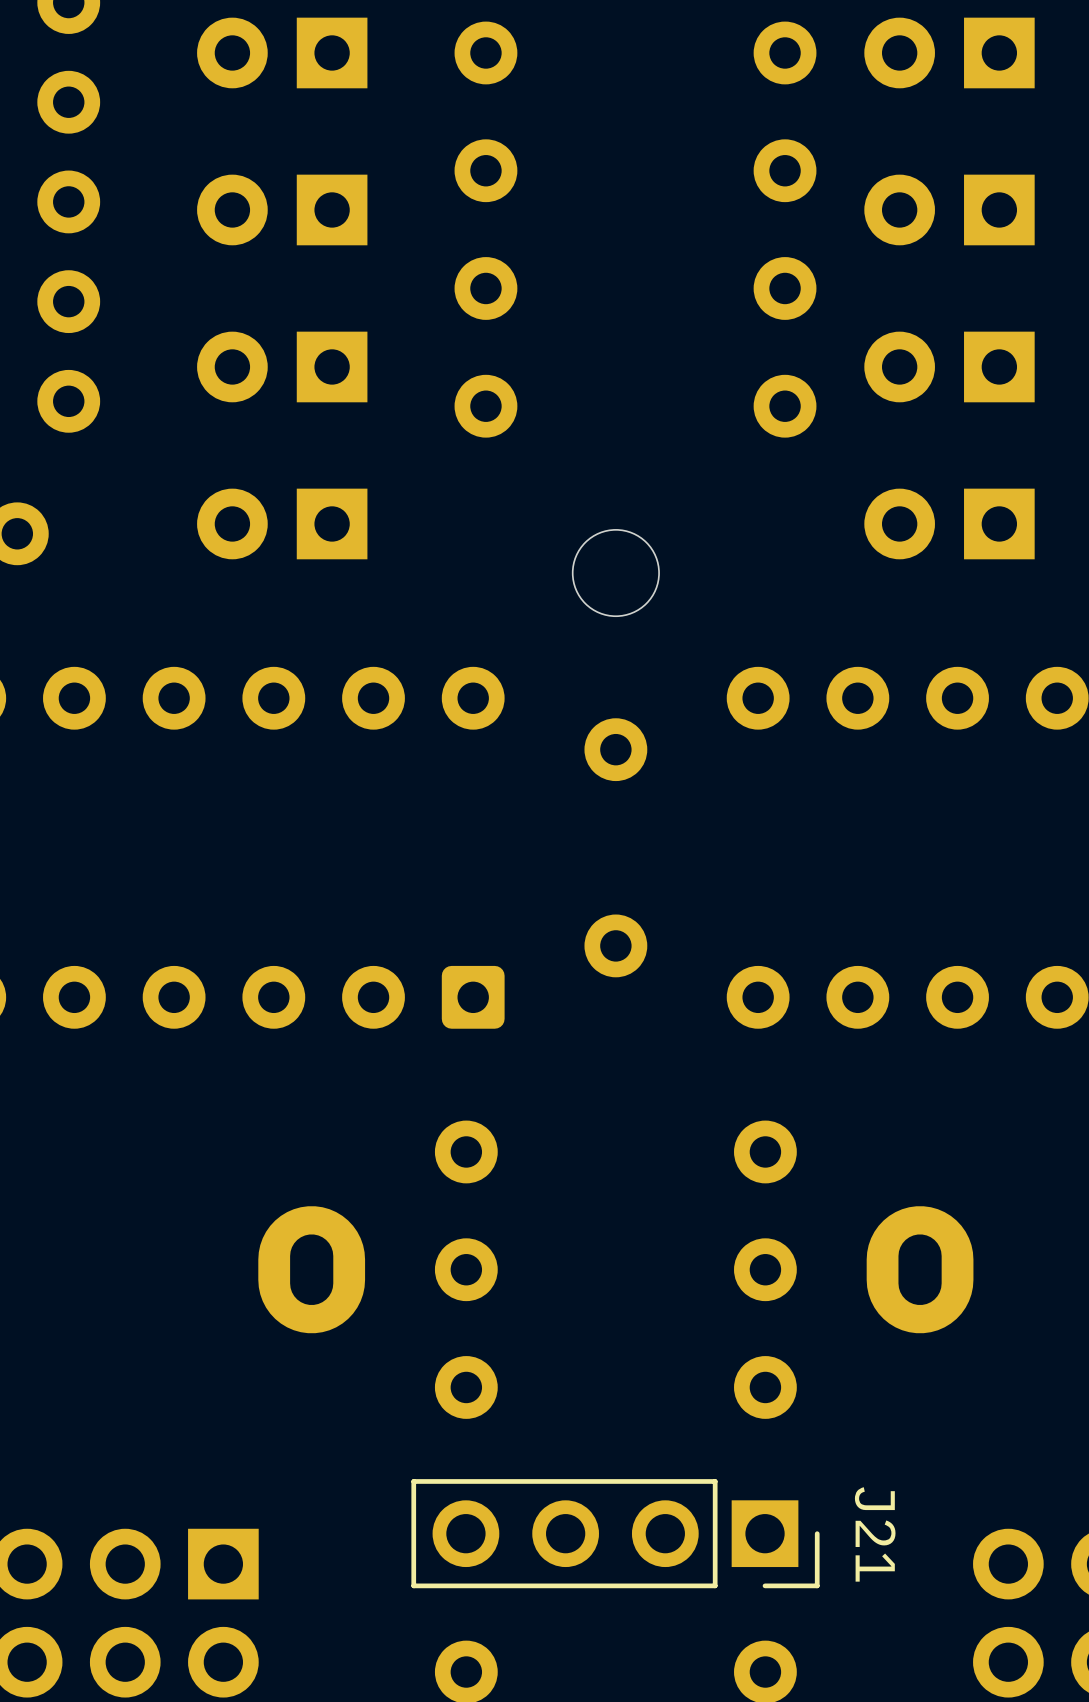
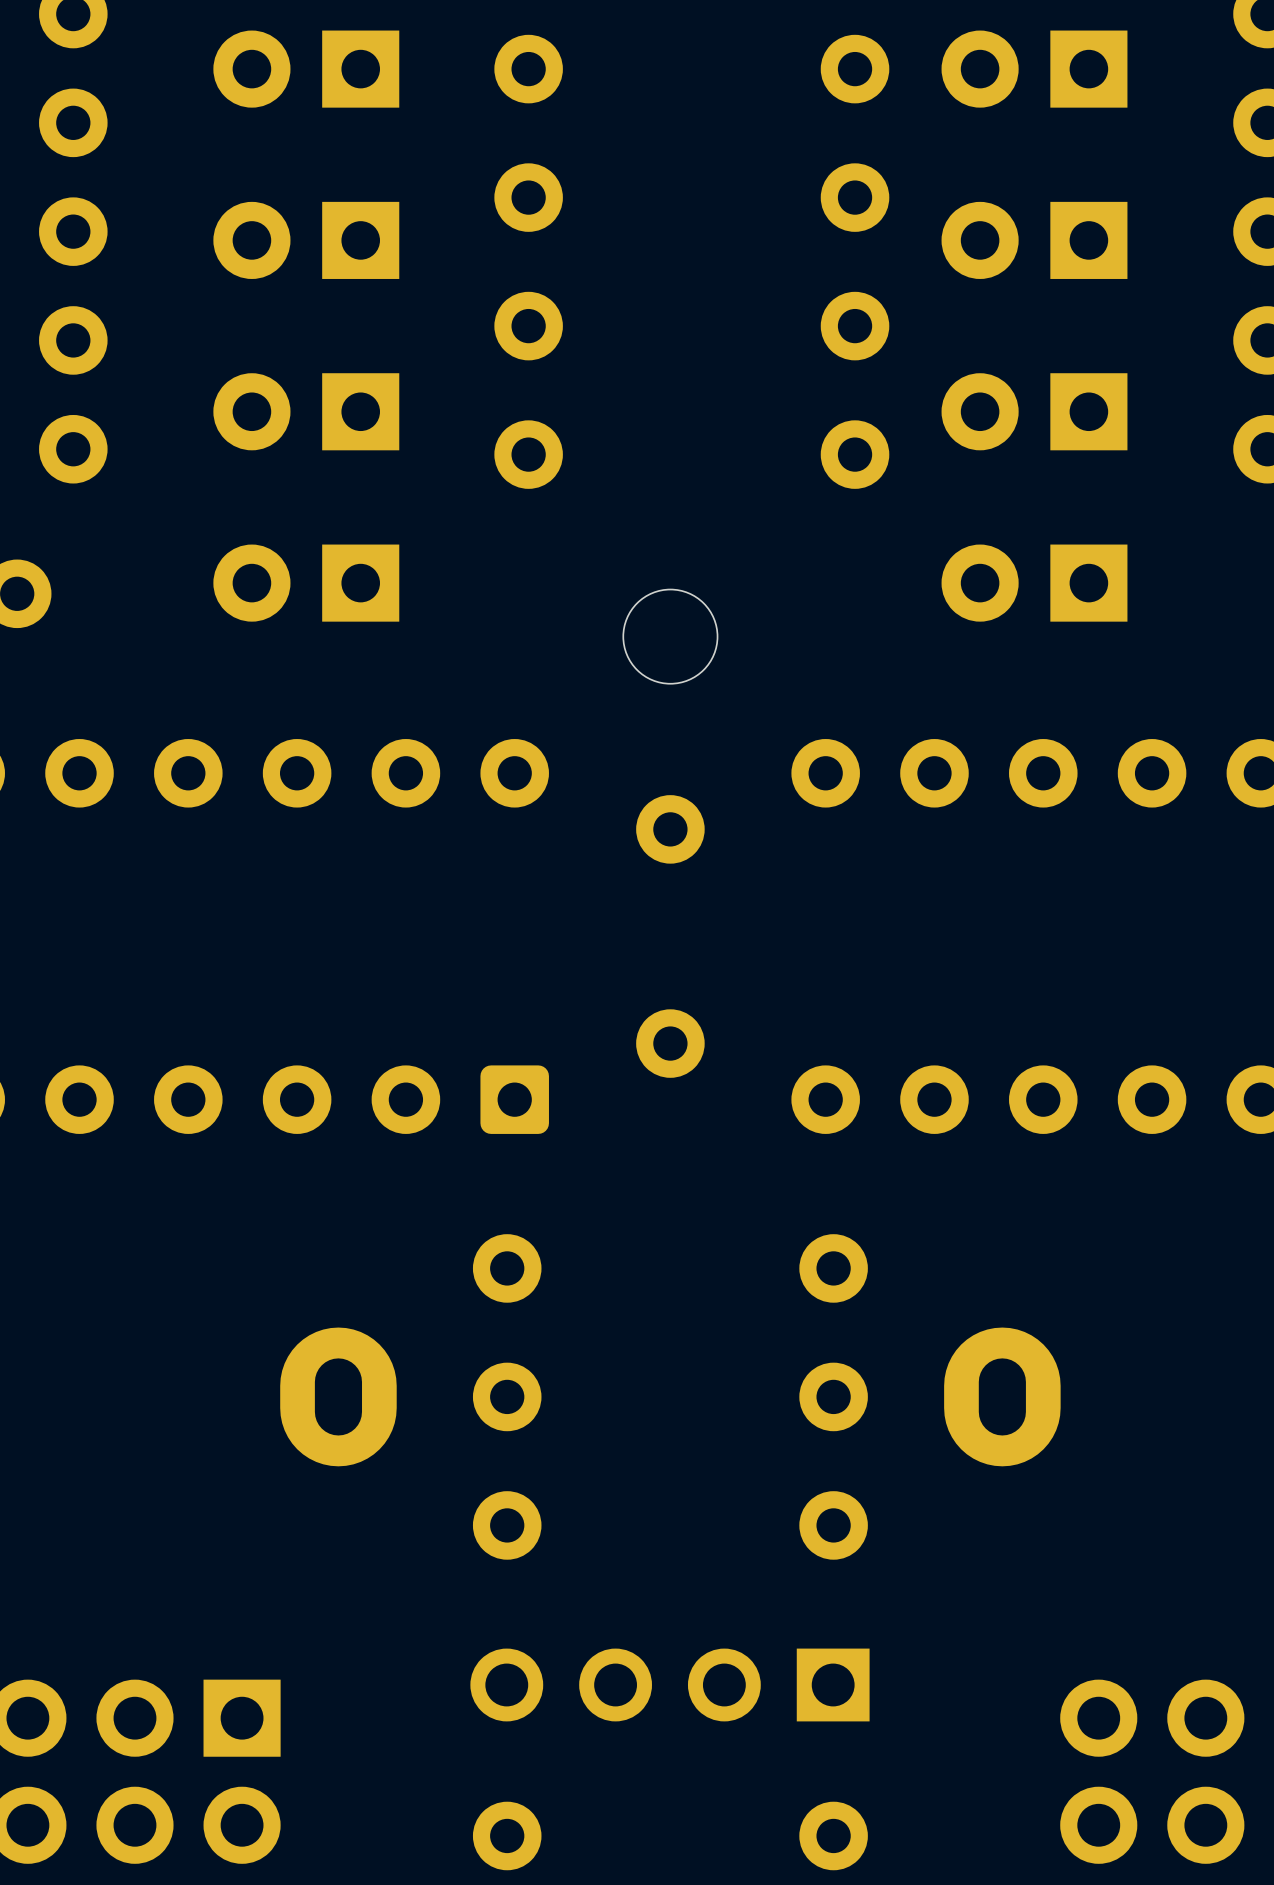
J21 side: bottom (615, 1533) -> top (669, 1684)

